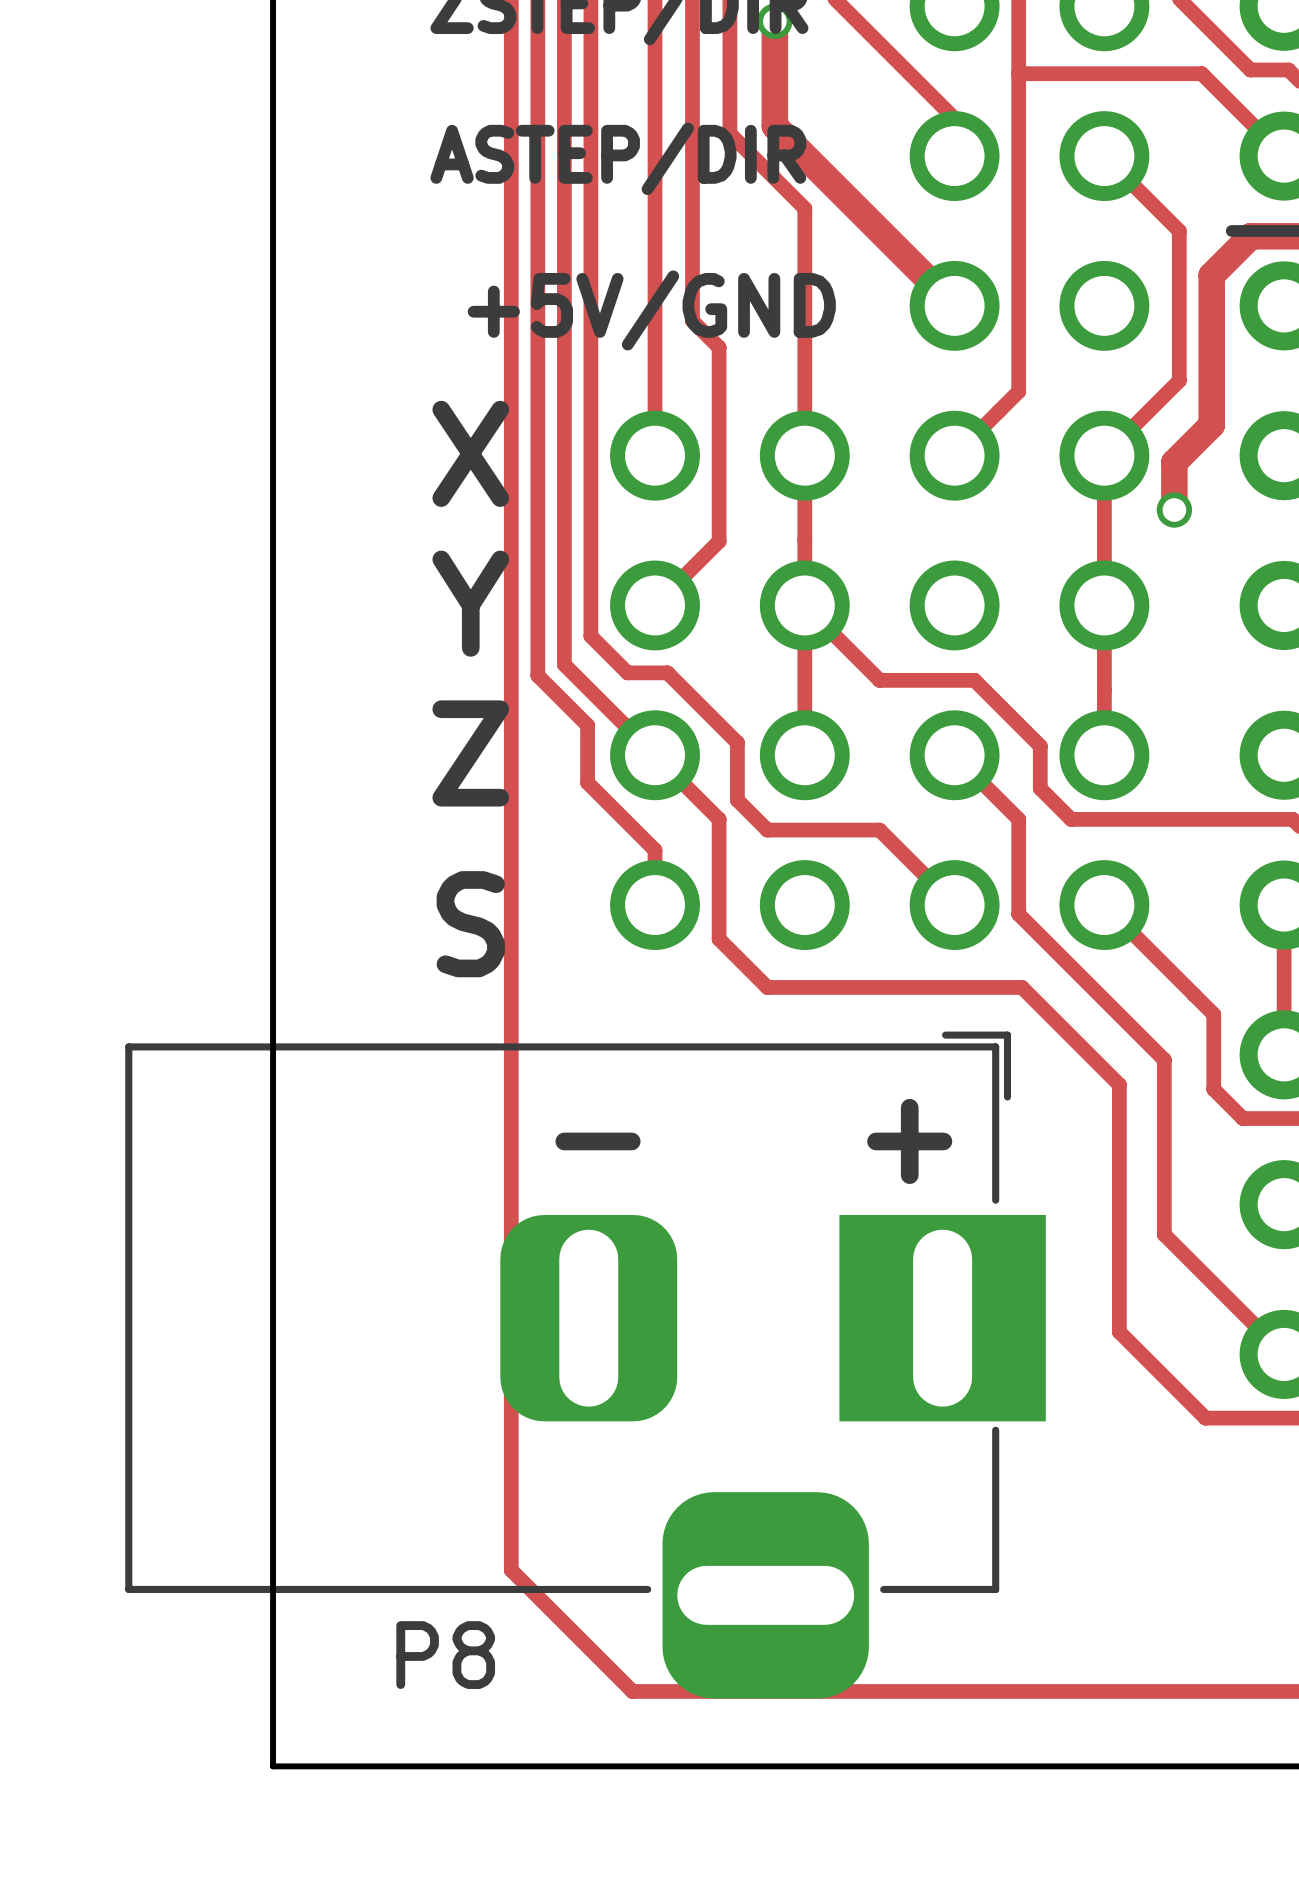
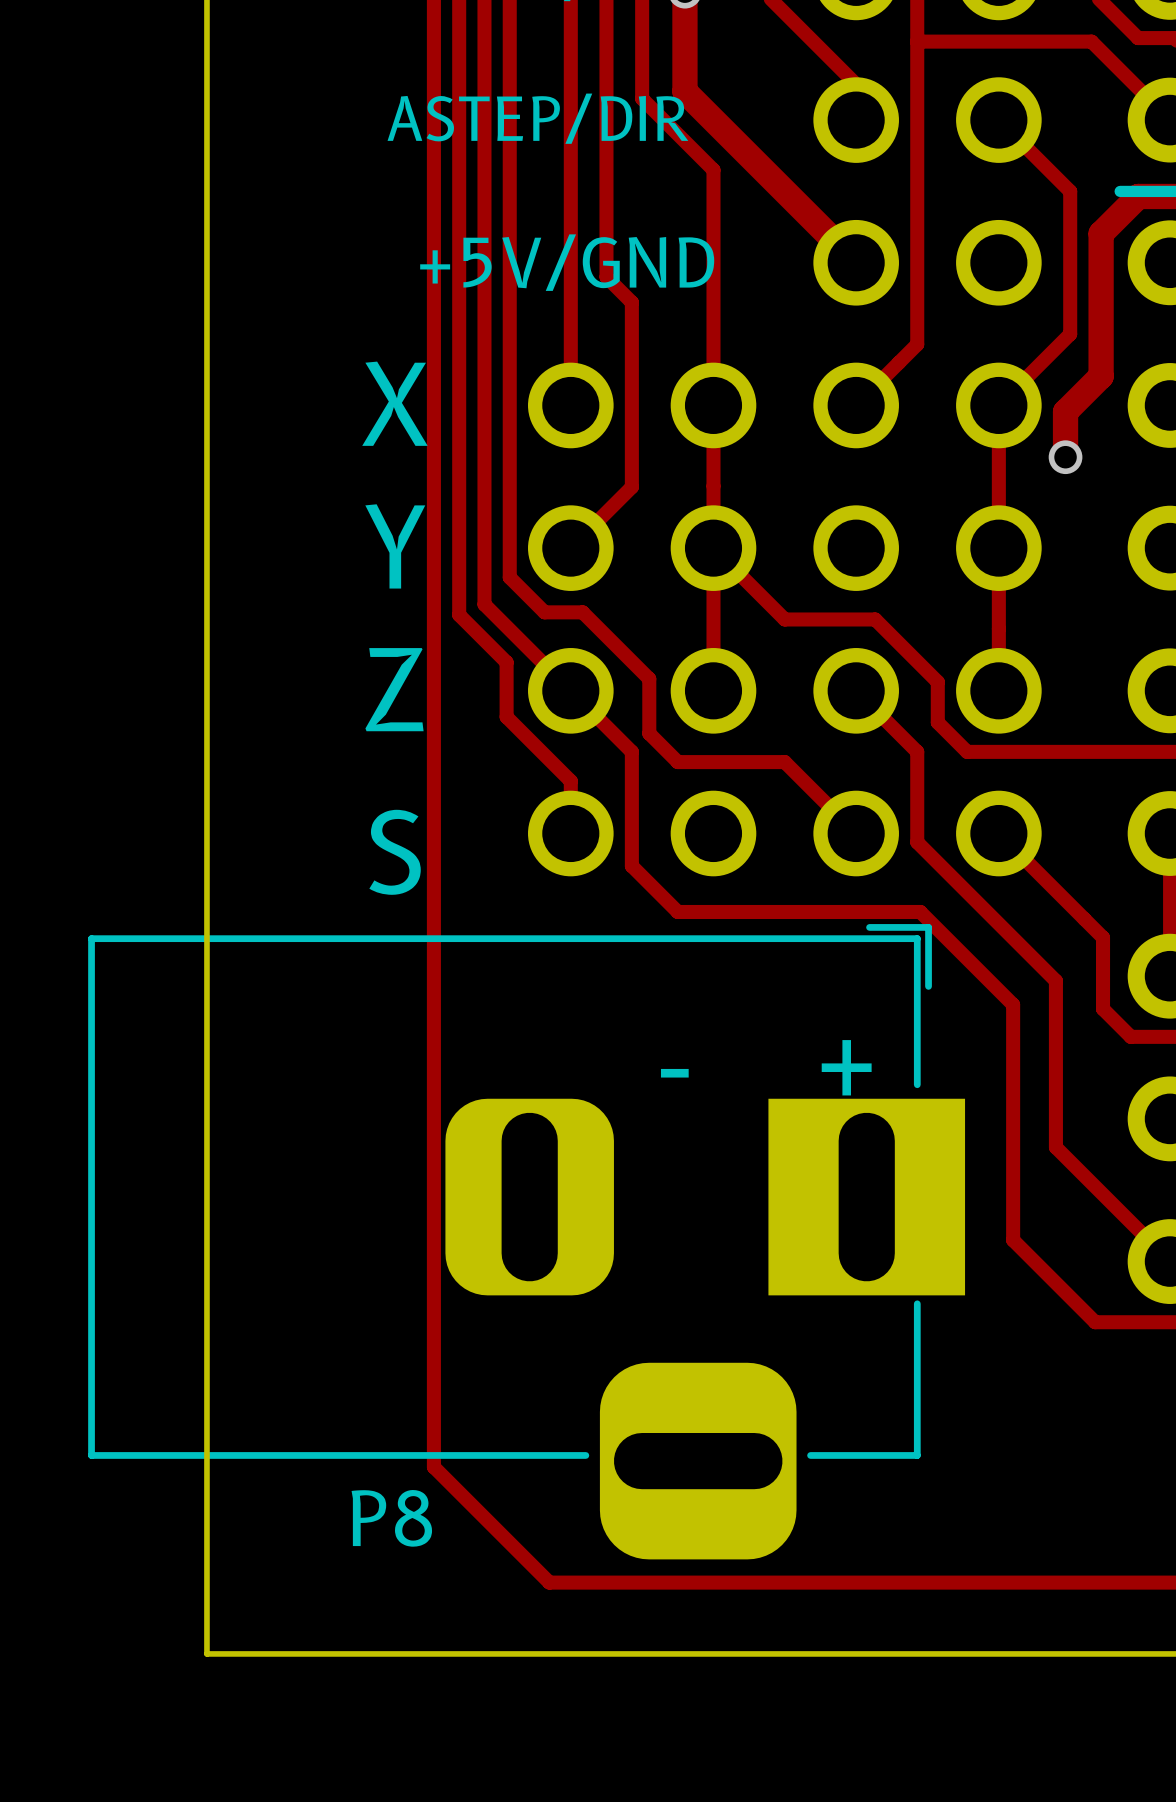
text position: - + (753, 1141) -> - + (766, 1067)
P8 position: (585, 1365) -> (526, 1241)

